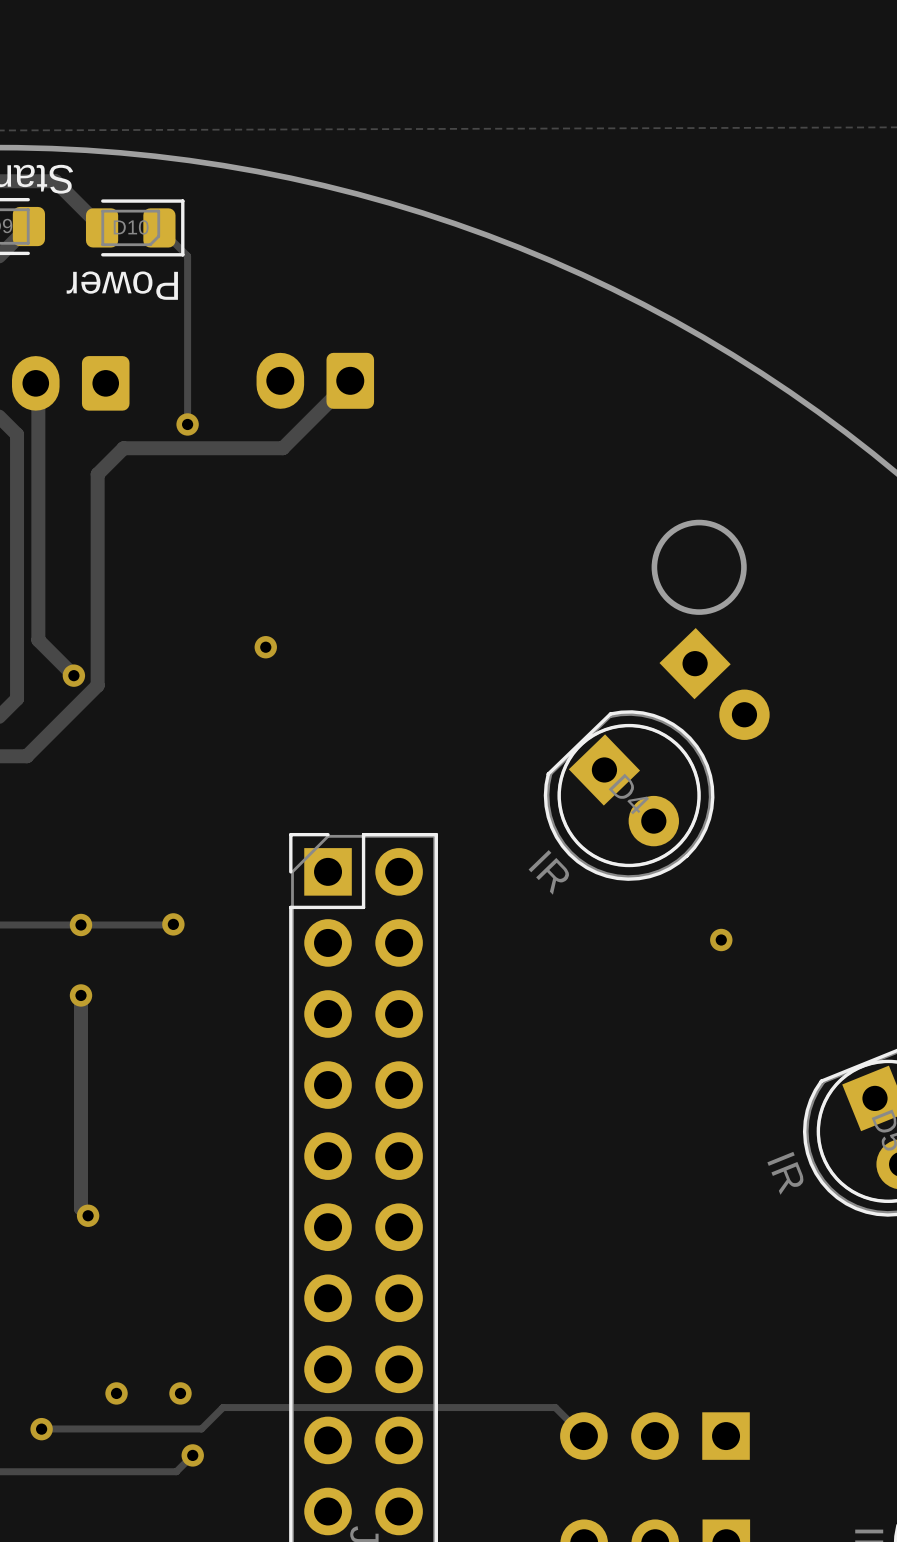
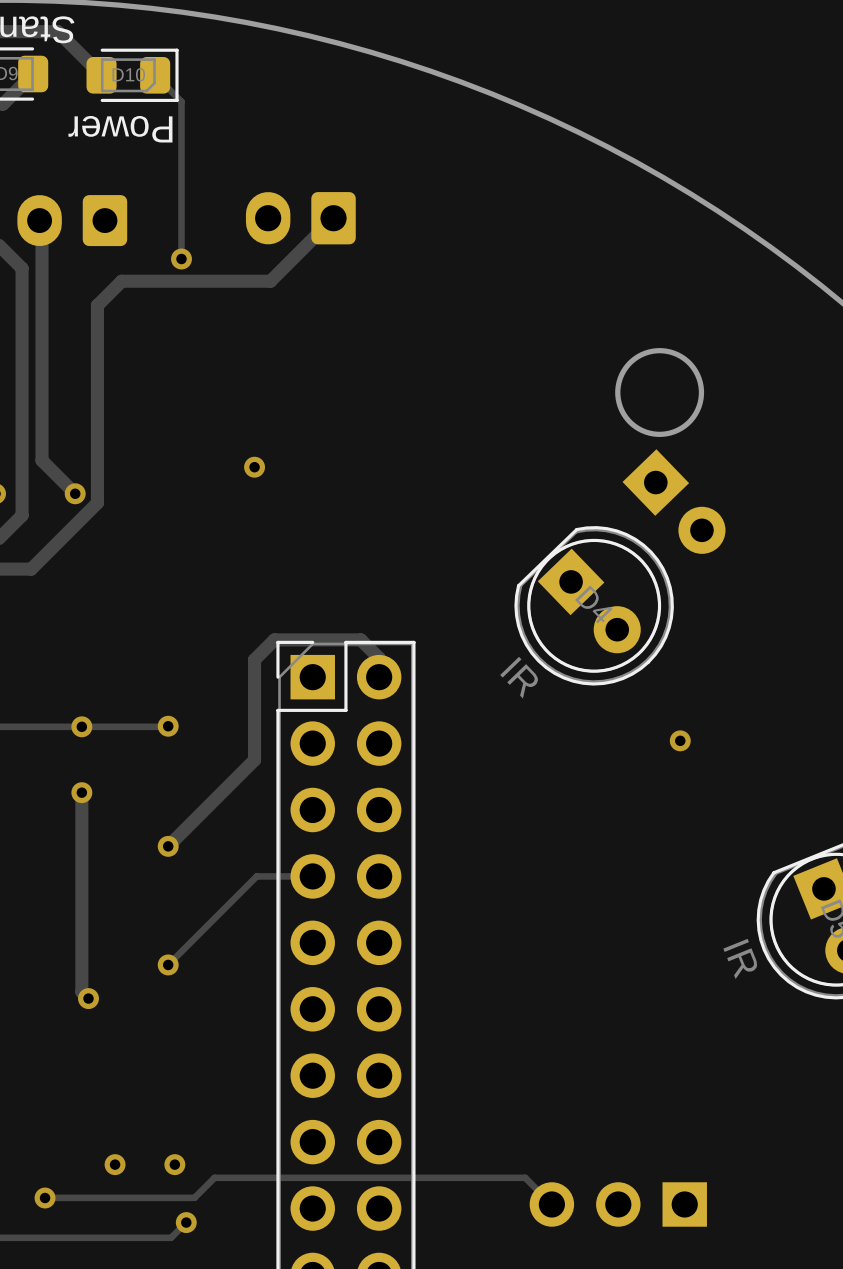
track: none -> (379, 677) (379, 658) (360, 639) (274, 639) (254, 659) (254, 760) (168, 846)
via: none -> (168, 846)
track: none -> (312, 876) (256, 876) (168, 964)
via: none -> (168, 964)

